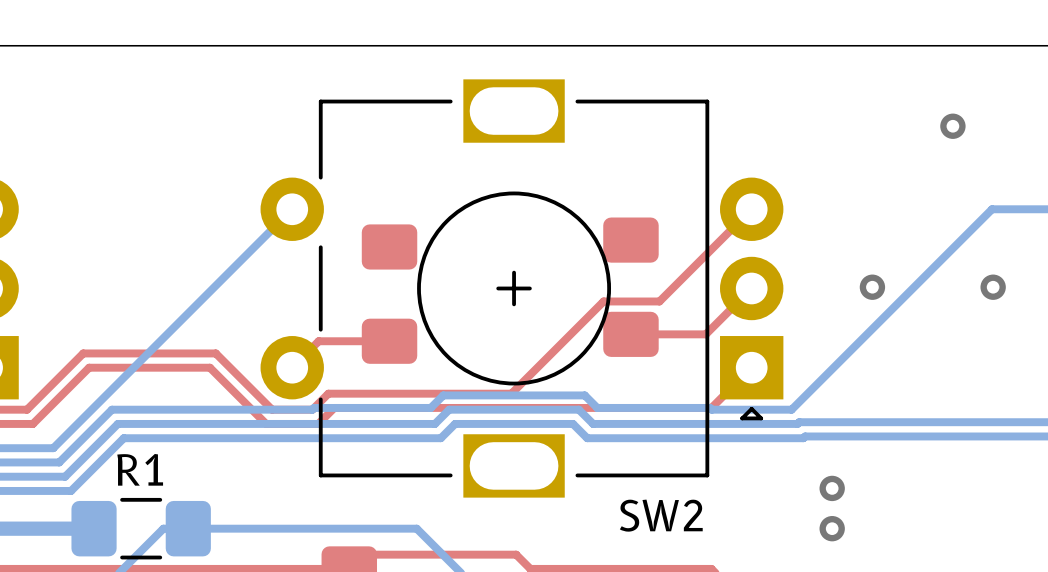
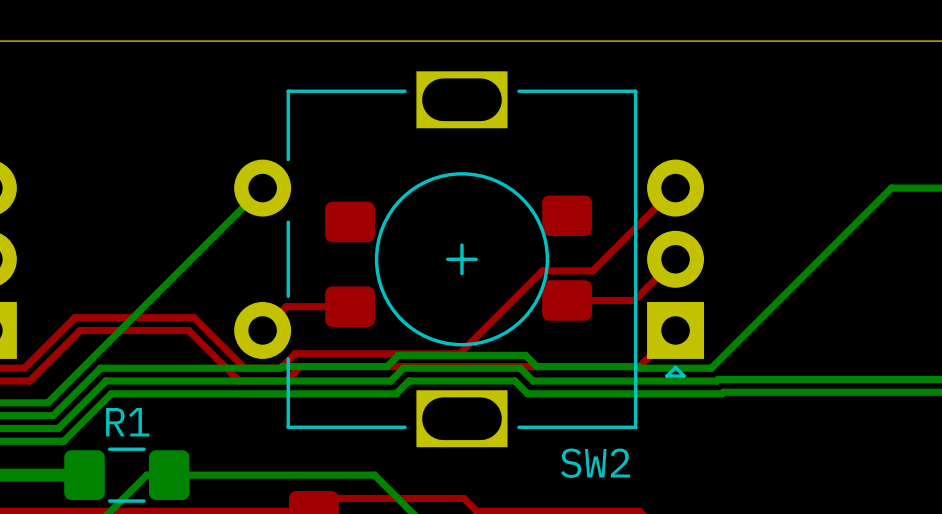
via: (952, 126) -> none
via: (872, 287) -> none
via: (993, 287) -> none
via: (832, 488) -> none
via: (832, 528) -> none

